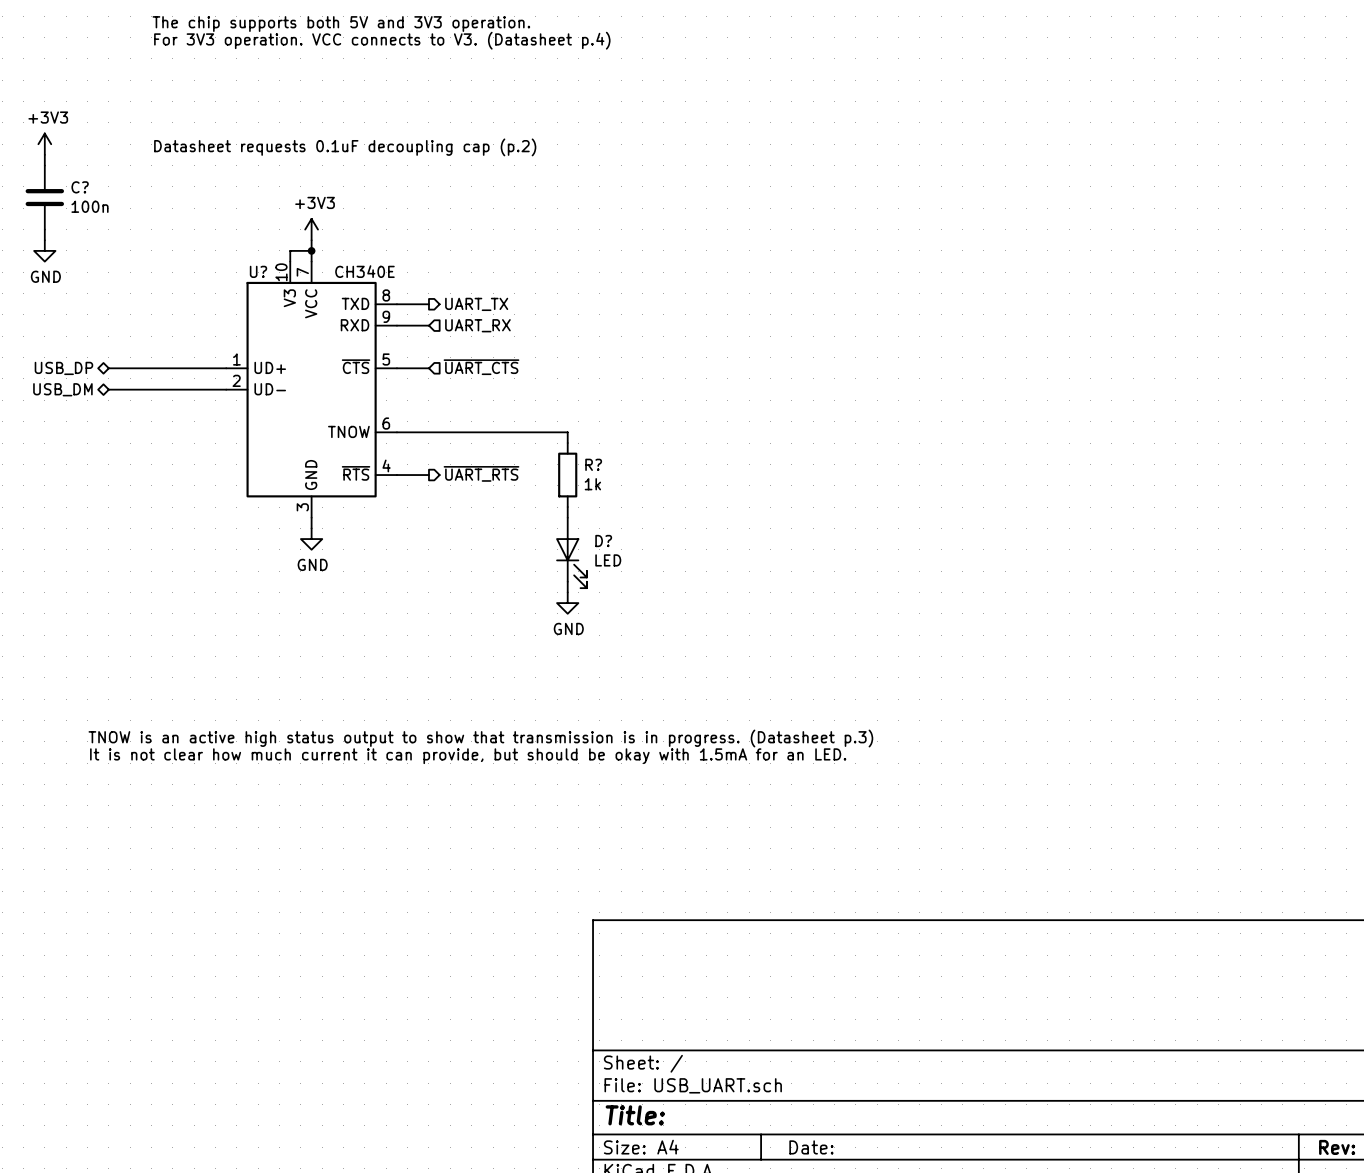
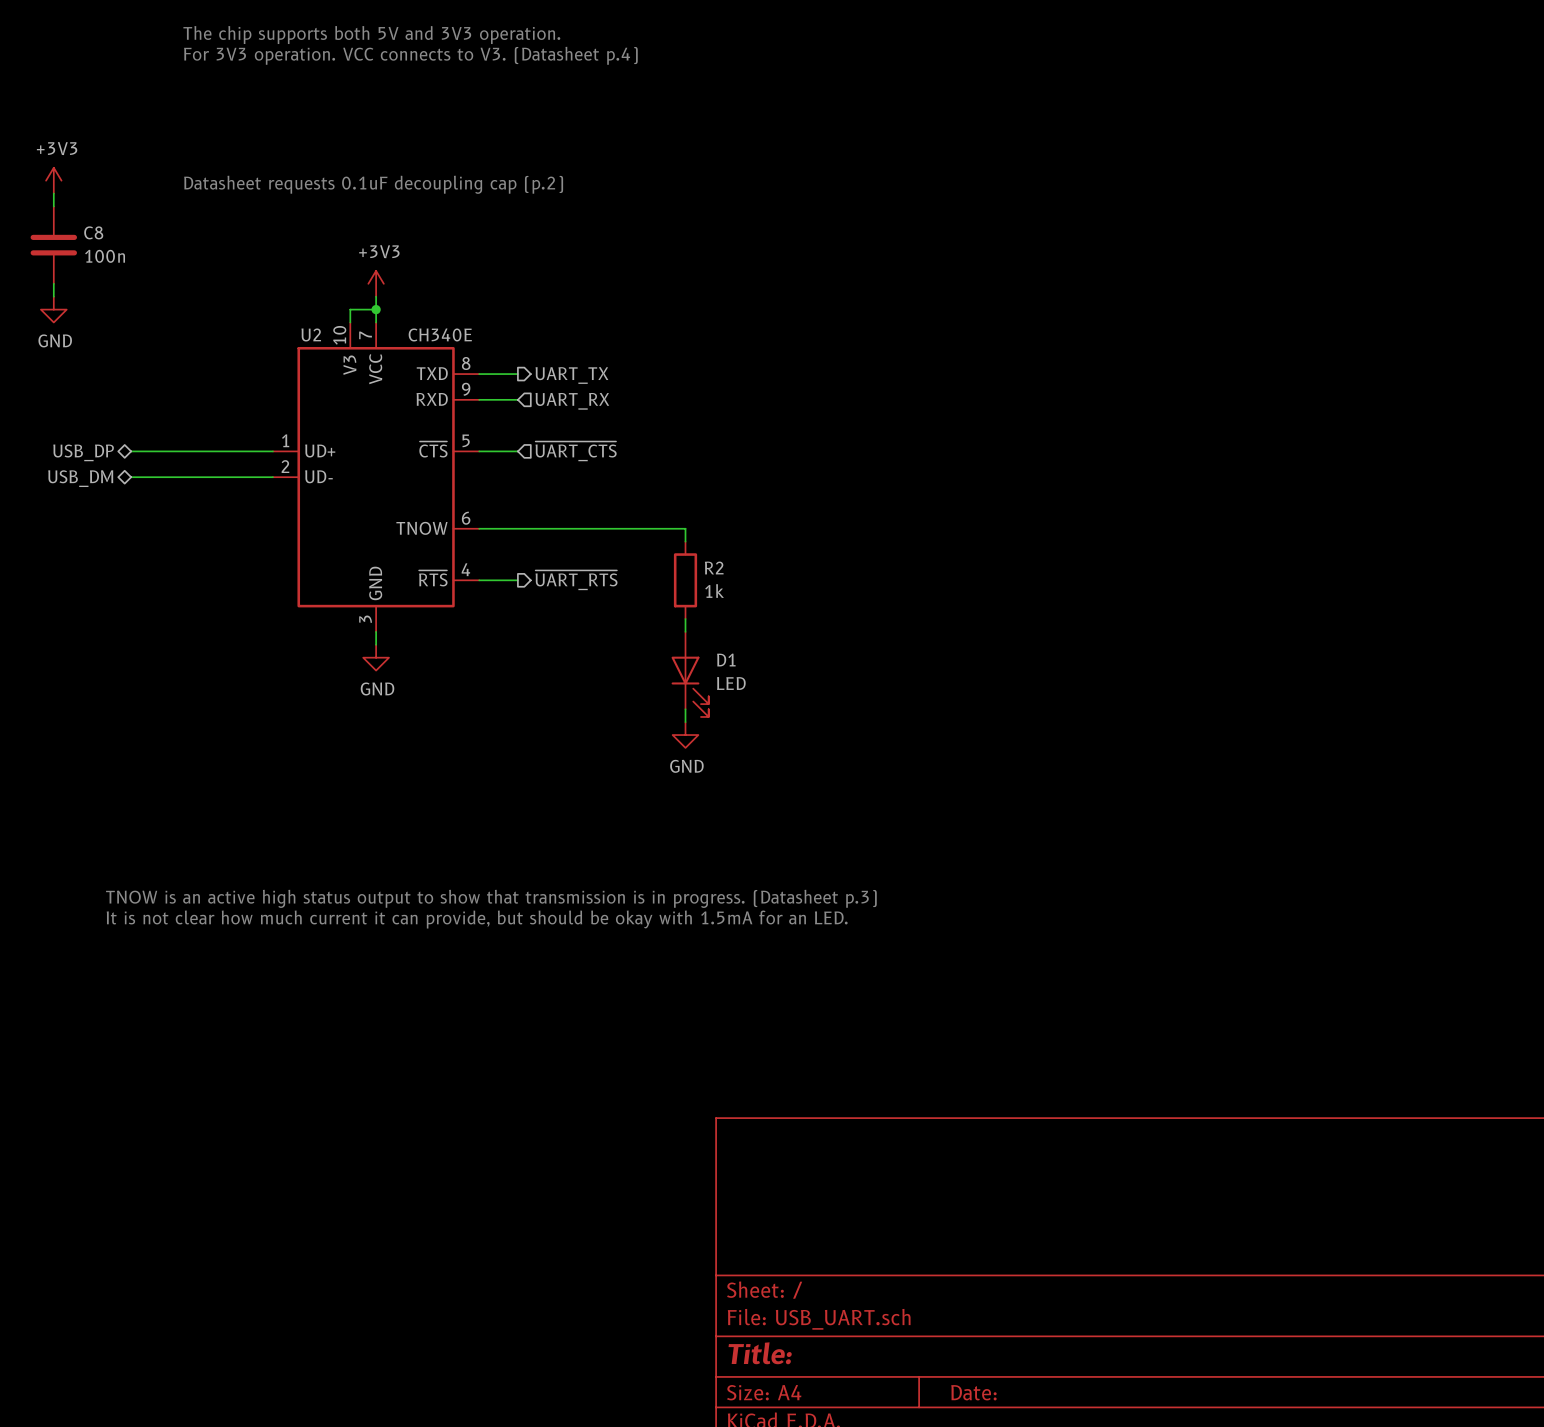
C? name: C? (80, 187) -> C8 (93, 232)
U? name: U? (258, 271) -> U2 (311, 334)
R? name: R? (593, 464) -> R2 (714, 567)
D? name: D? (603, 541) -> D1 (726, 660)

